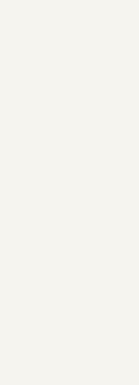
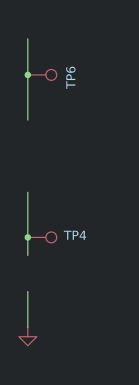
wire: none -> (27, 38) (27, 120)
junction: none -> (27, 74)
TP6: none -> (42, 74)
wire: none -> (27, 192) (27, 255)
junction: none -> (27, 237)
TP4: none -> (42, 237)
wire: none -> (27, 291) (27, 327)
power symbol: none -> (27, 336)

